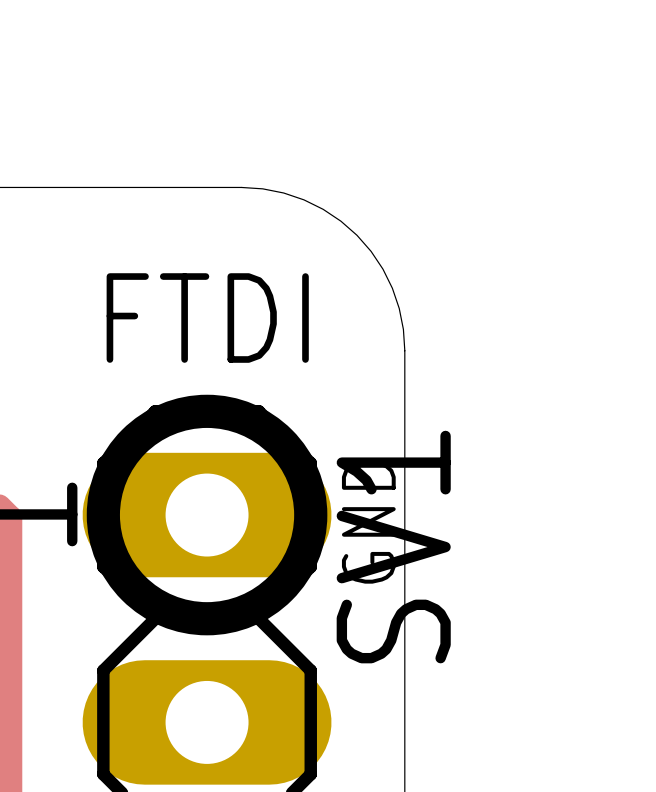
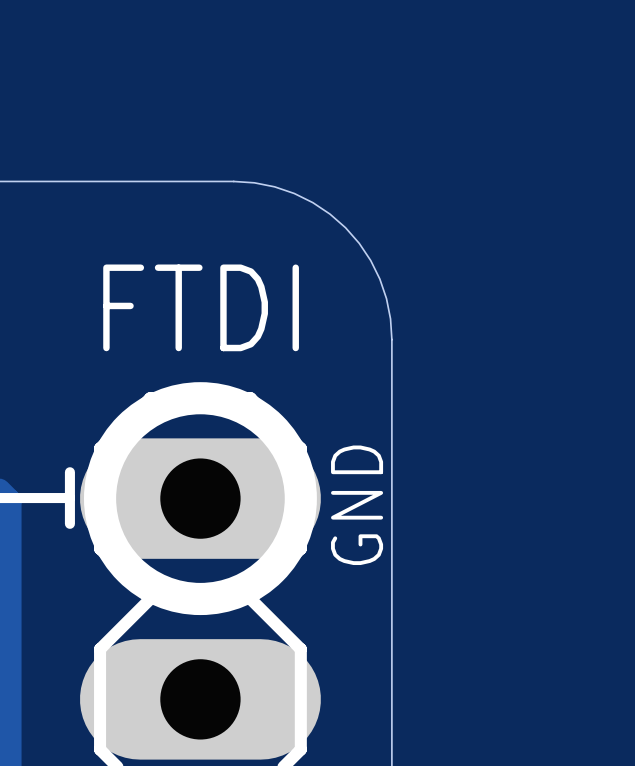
SV1 name: SV1 (393, 547) -> none

